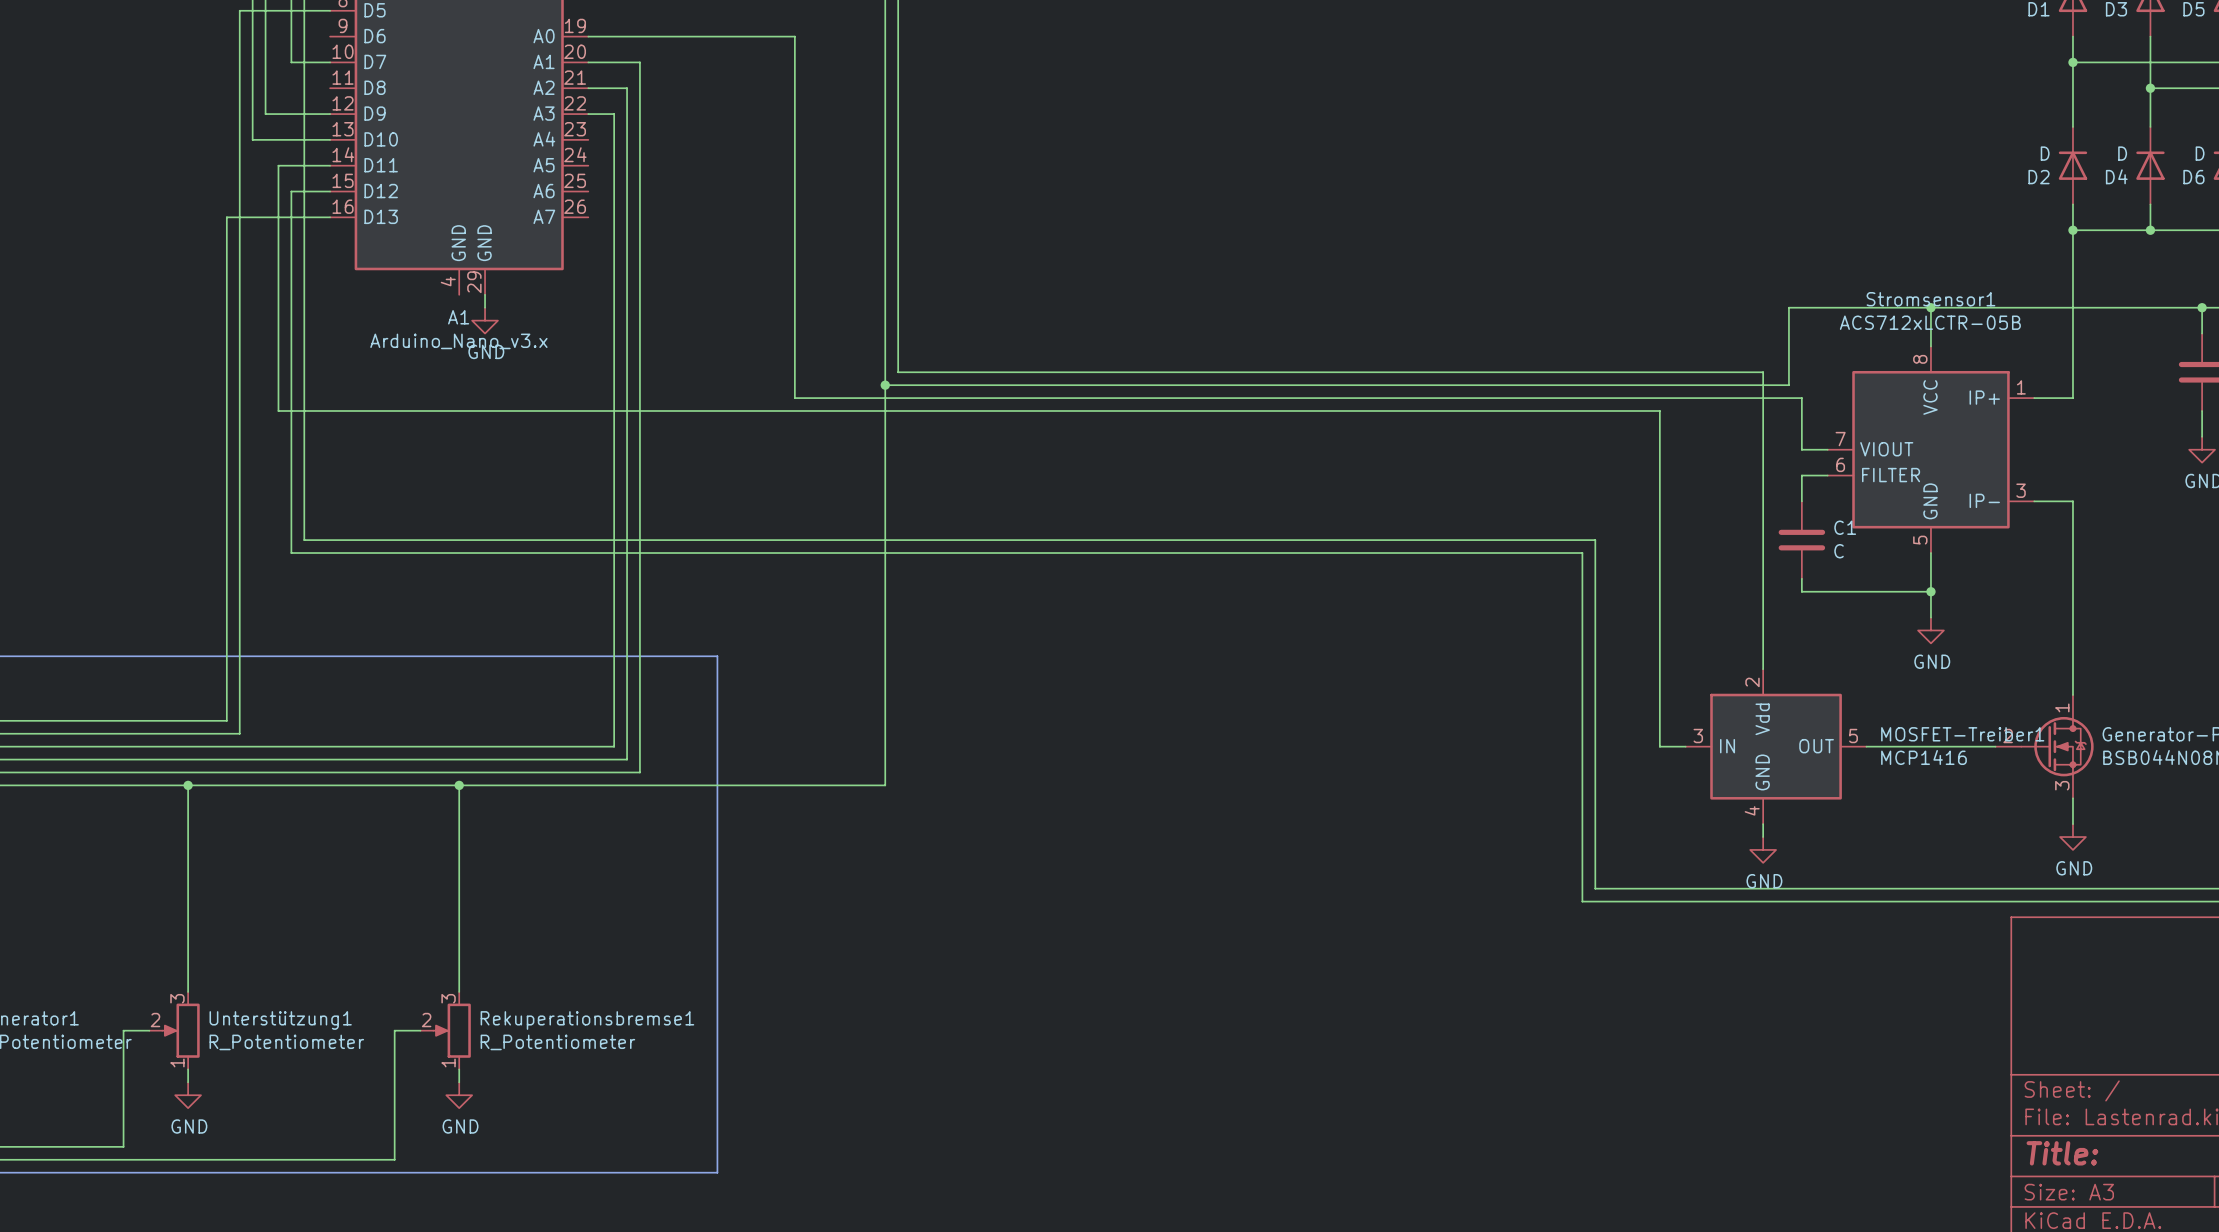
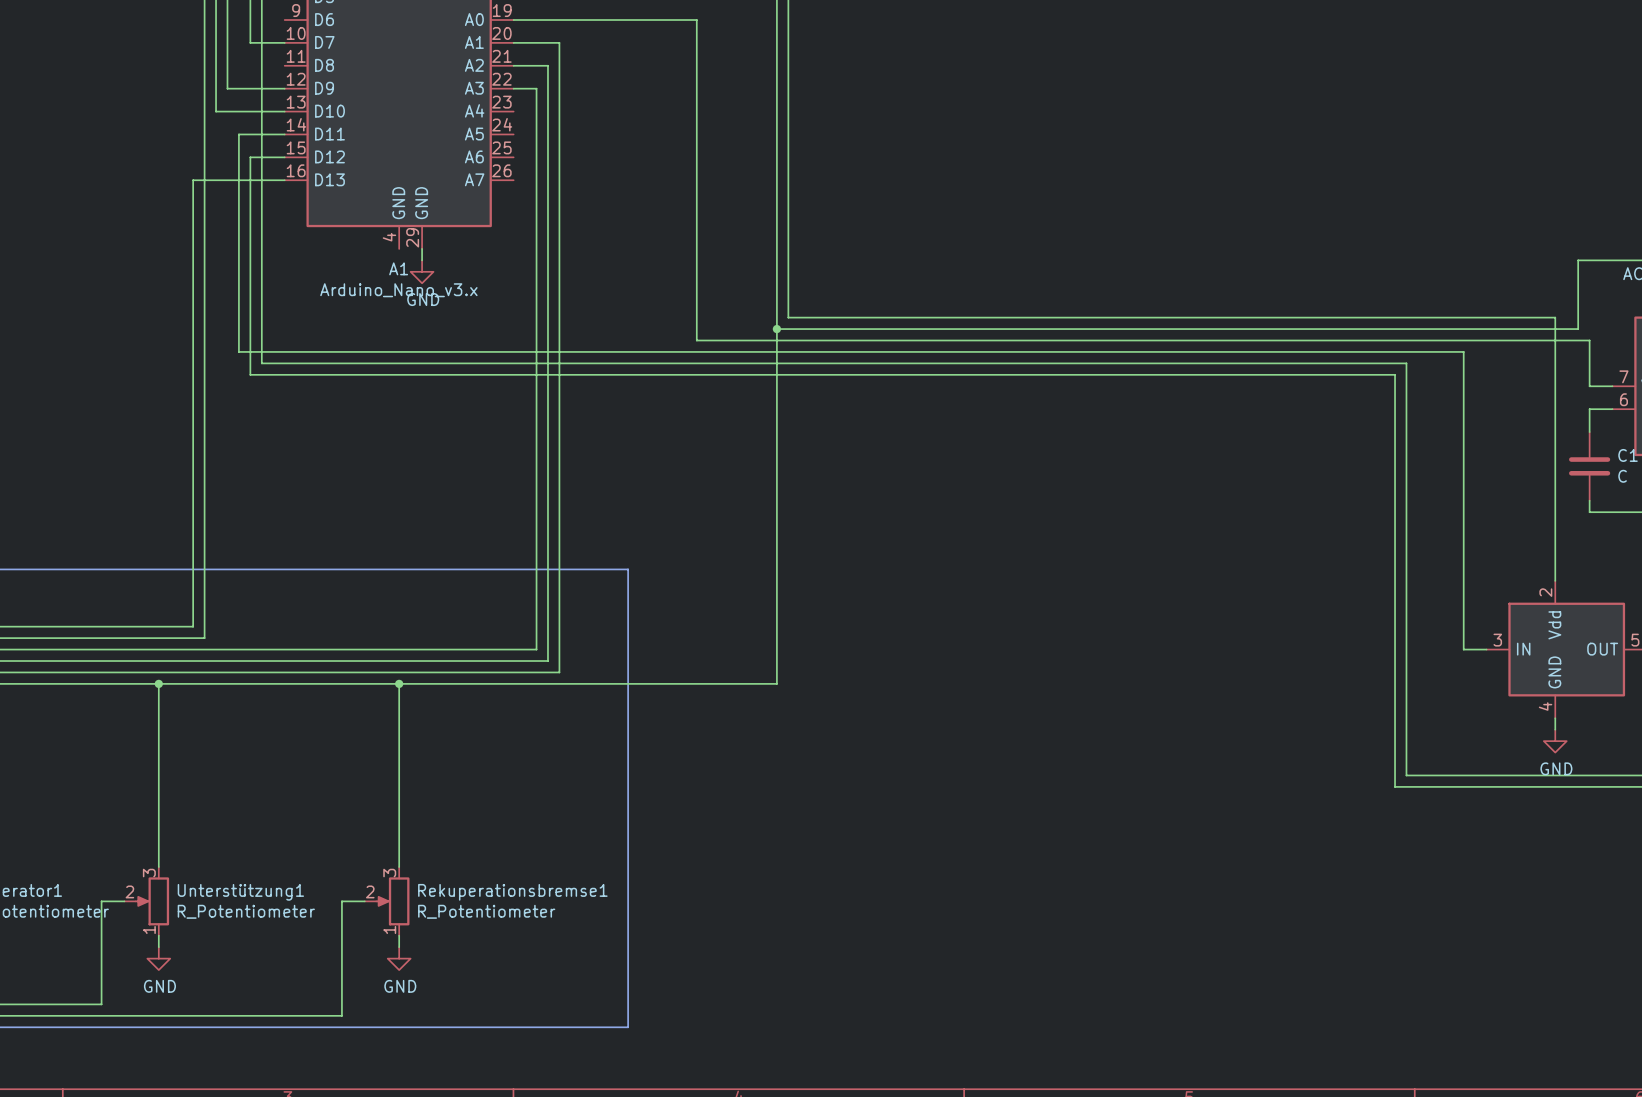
wire: (304, 423) (304, 540) (1595, 540) -> (261, 363) (1406, 363) (1406, 466)
wire: (291, 436) (291, 553) (1582, 553) -> (250, 374) (1395, 374) (1395, 477)

